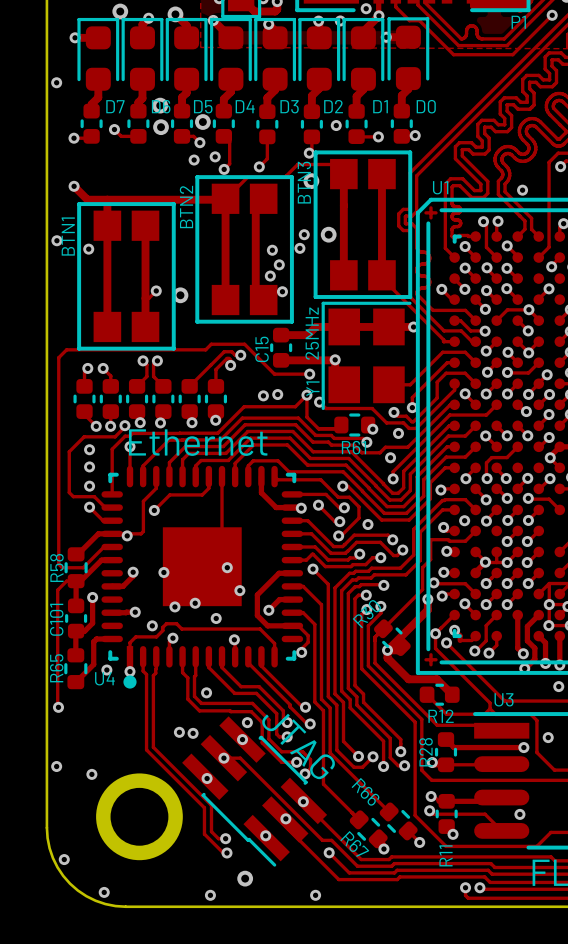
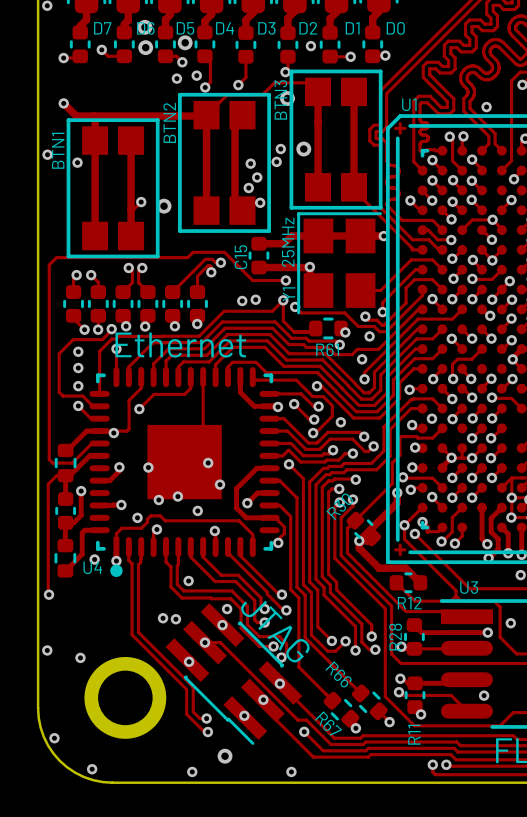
R58 name: R58 (56, 567) -> none
C101 name: C101 (56, 619) -> none
R65 name: R65 (56, 668) -> none

